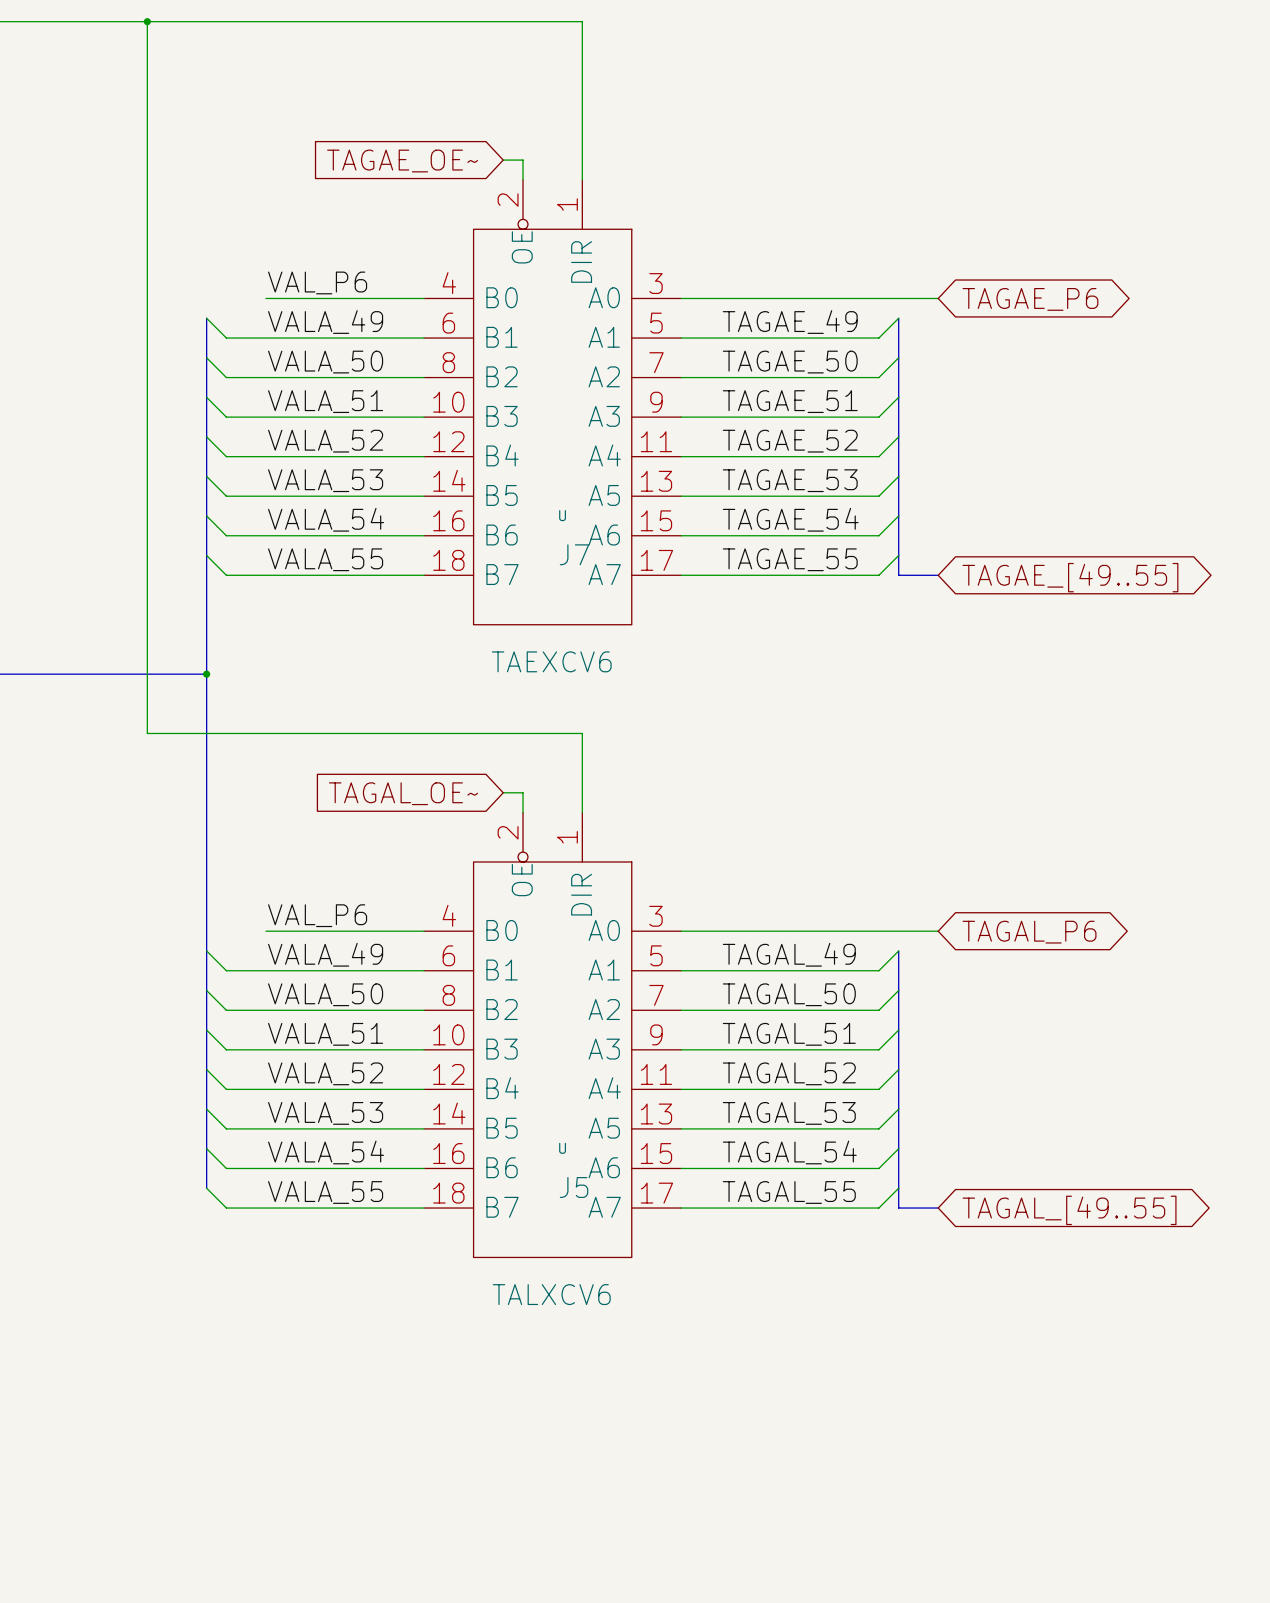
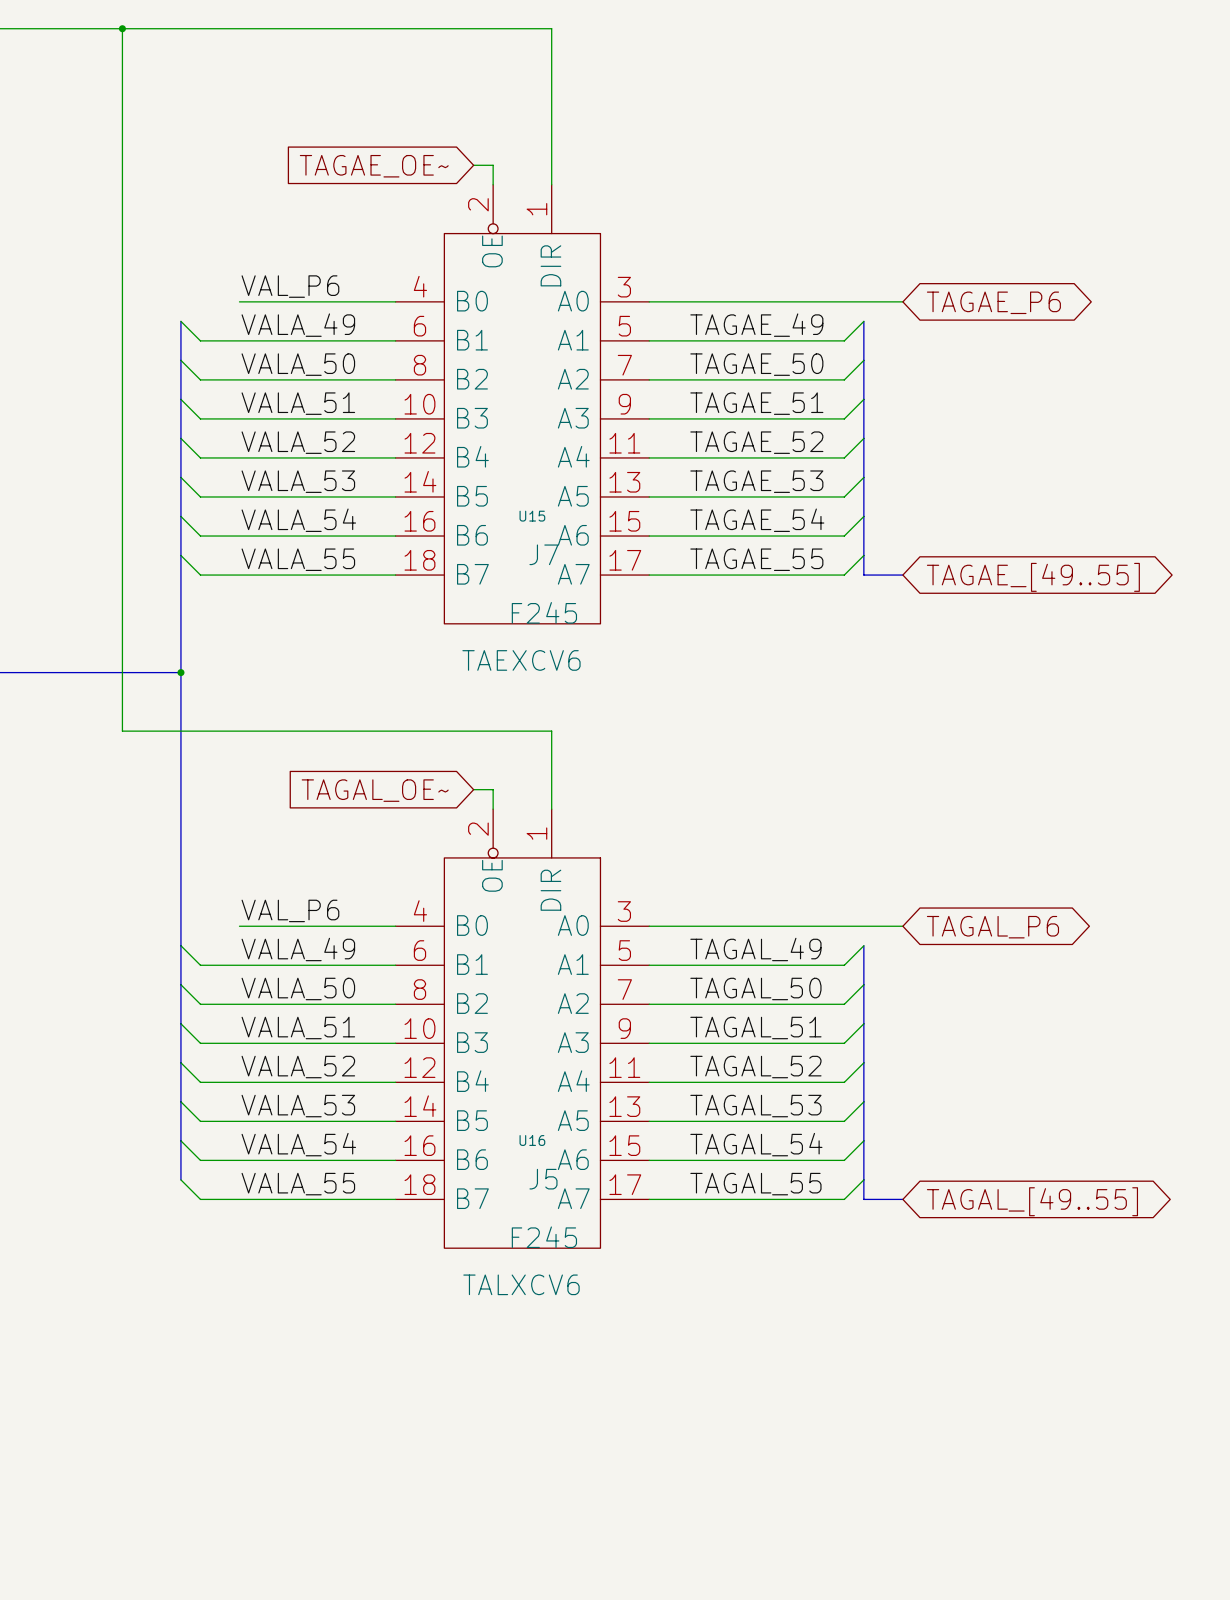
U name: U (562, 515) -> U15 (532, 516)
U value: none -> F245 (544, 612)
U name: U (562, 1148) -> U16 (532, 1140)
U value: none -> F245 (544, 1237)

